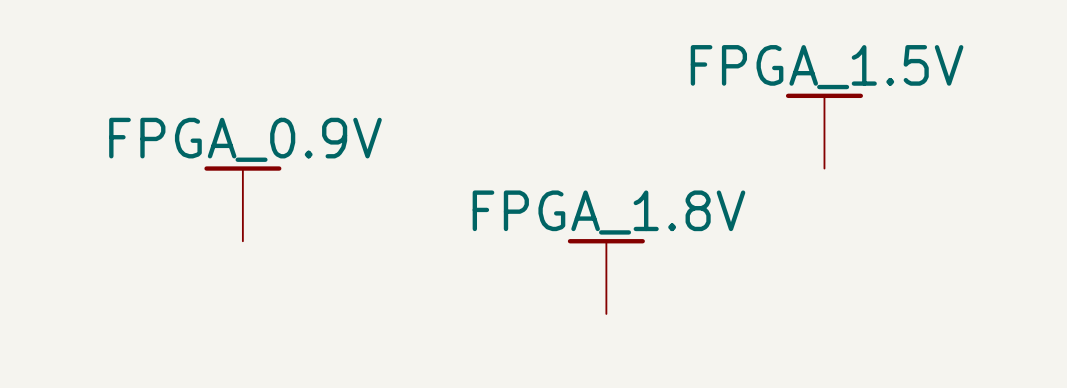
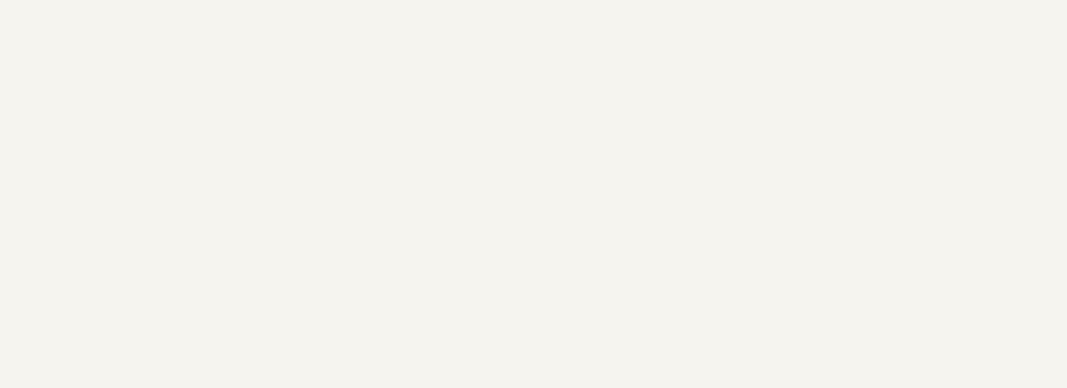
power symbol: FPGA_1.5V (824, 131) -> none
power symbol: FPGA_0.9V (242, 203) -> none
power symbol: FPGA_1.8V (606, 276) -> none

